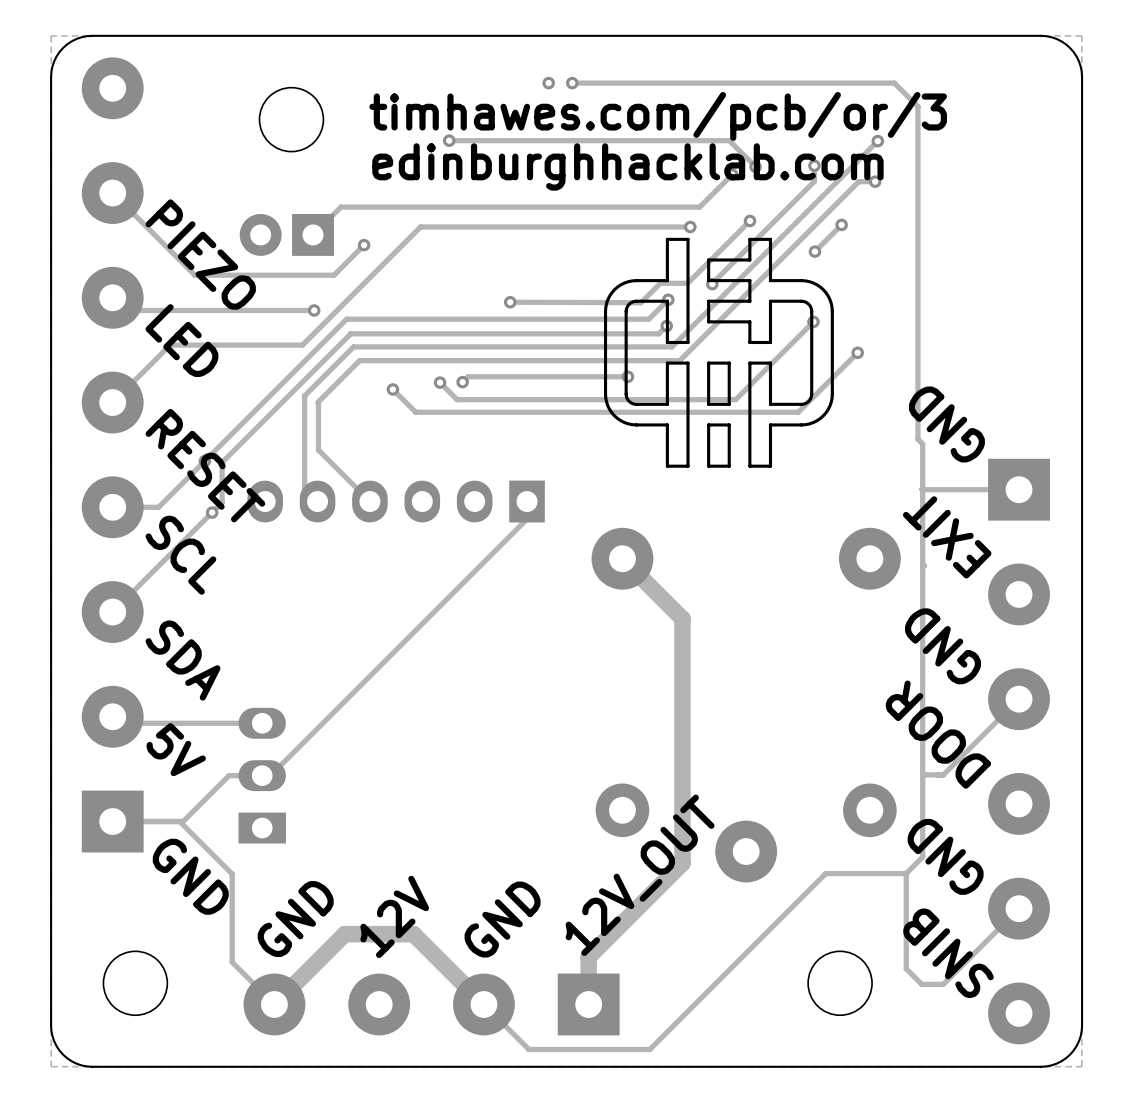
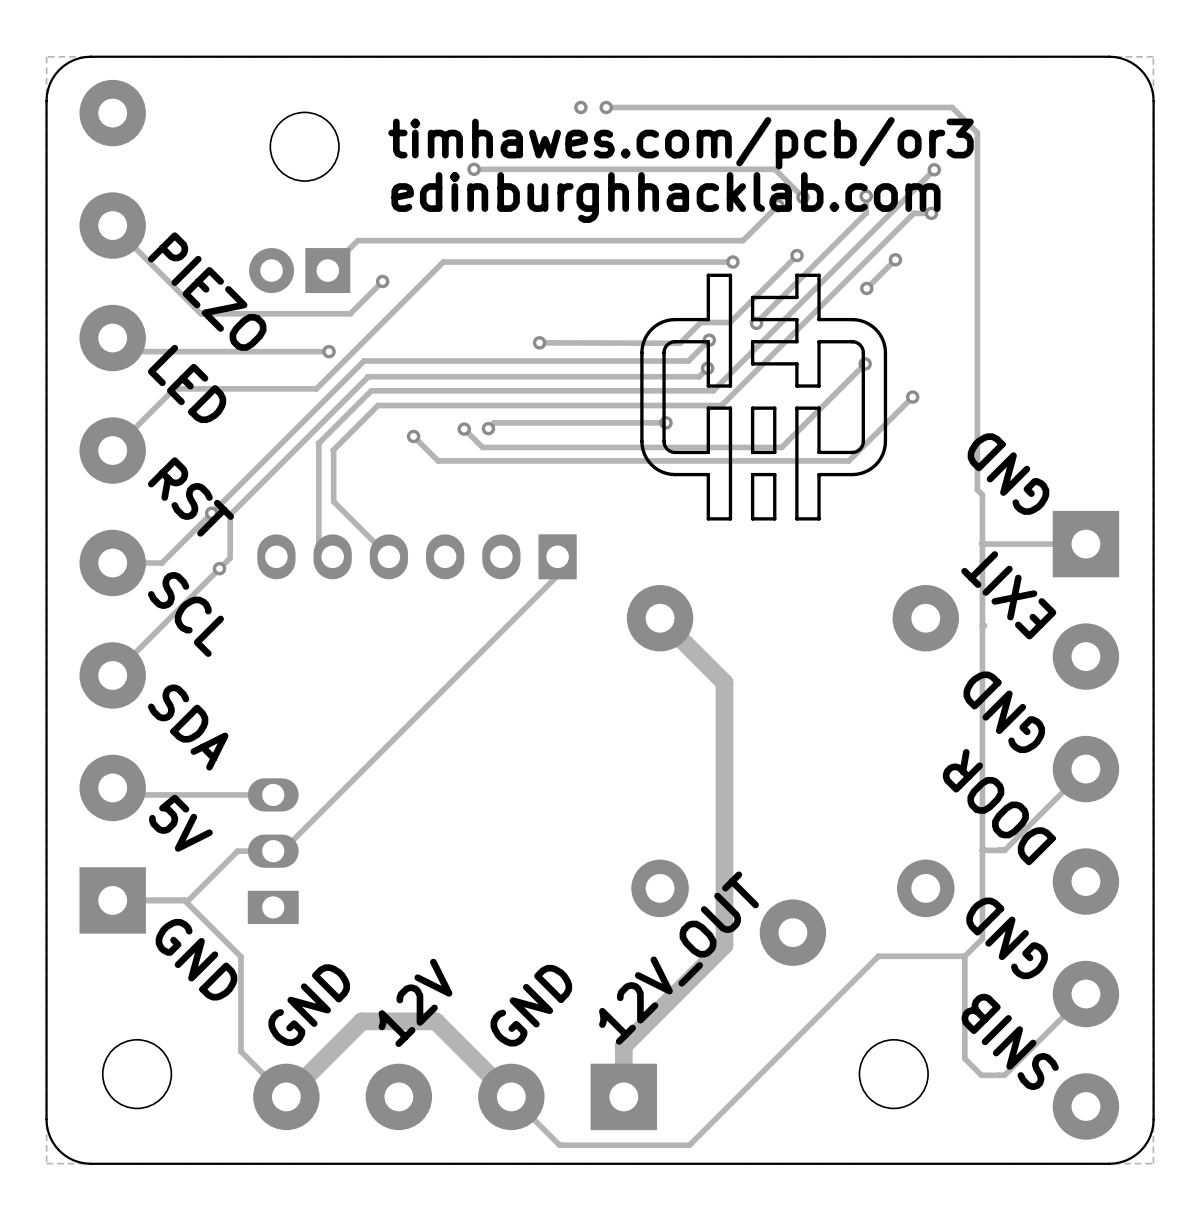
text: timhawes.com/pcb/or/3 (658, 116) -> timhawes.com/pcb/or3 (681, 143)
text: RESET (205, 465) -> RST (190, 496)

